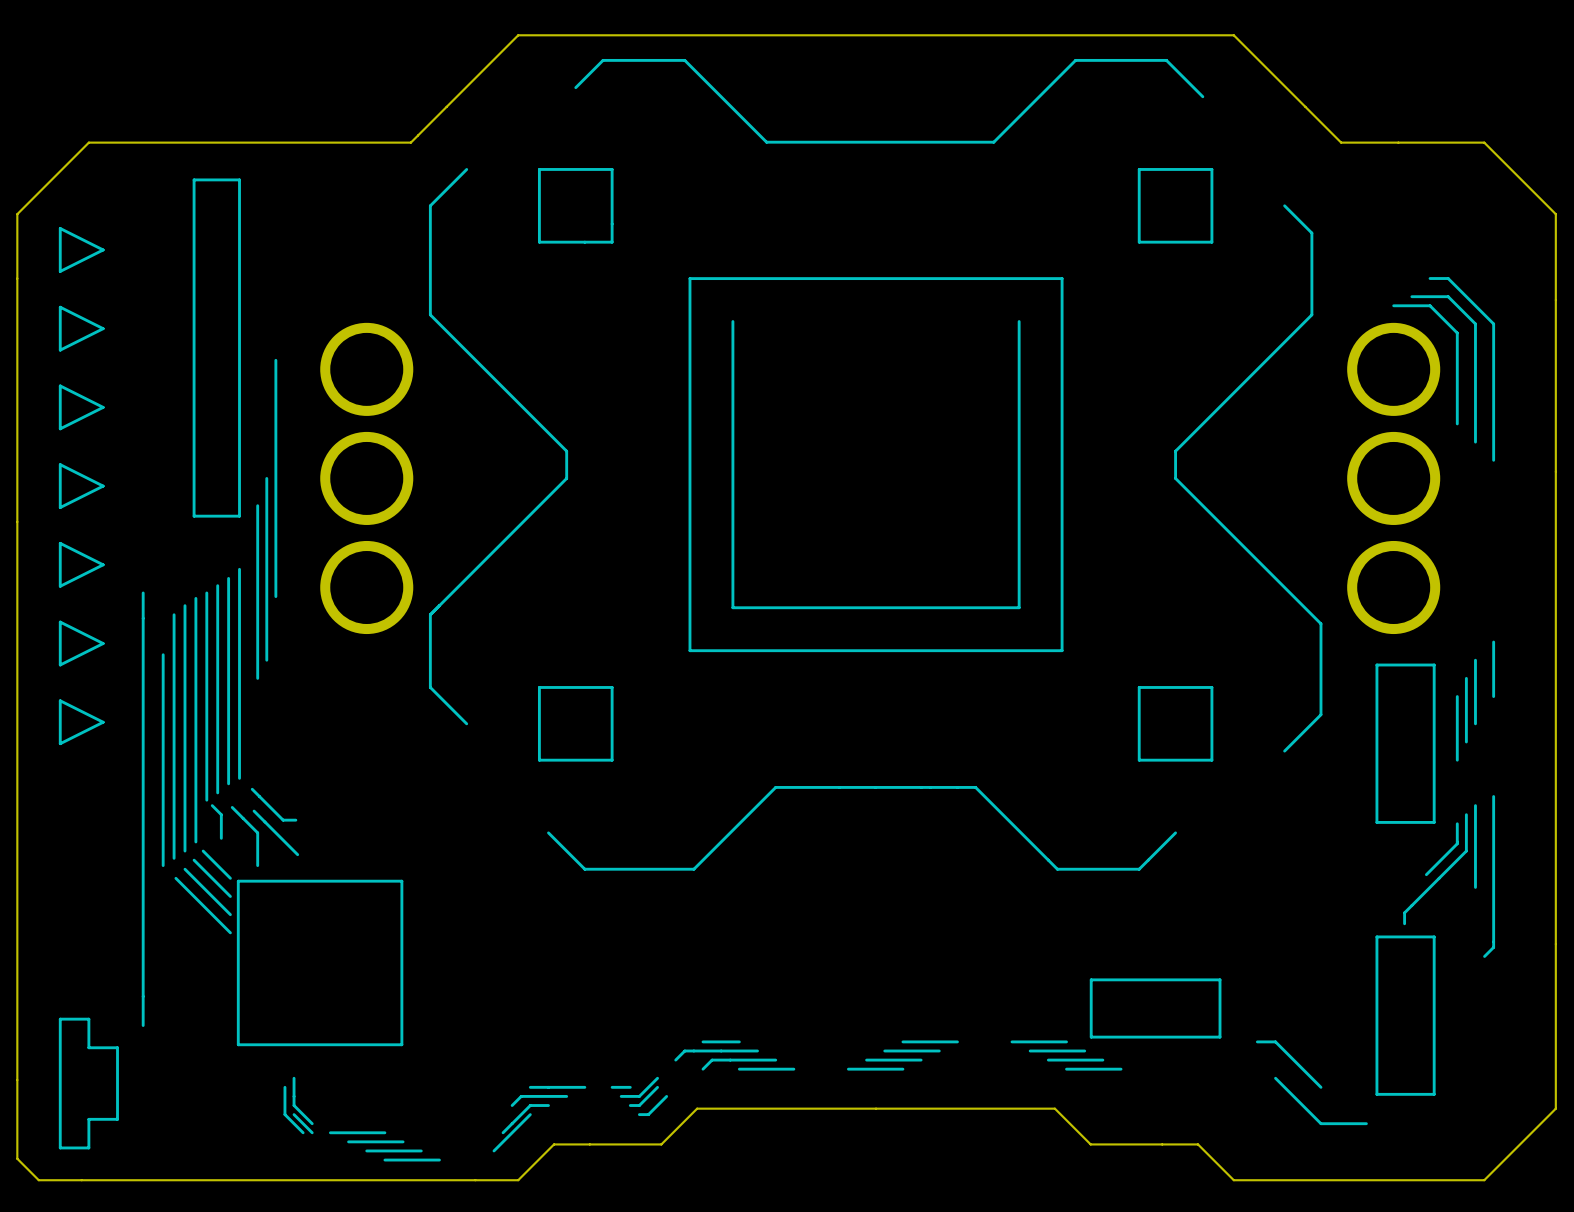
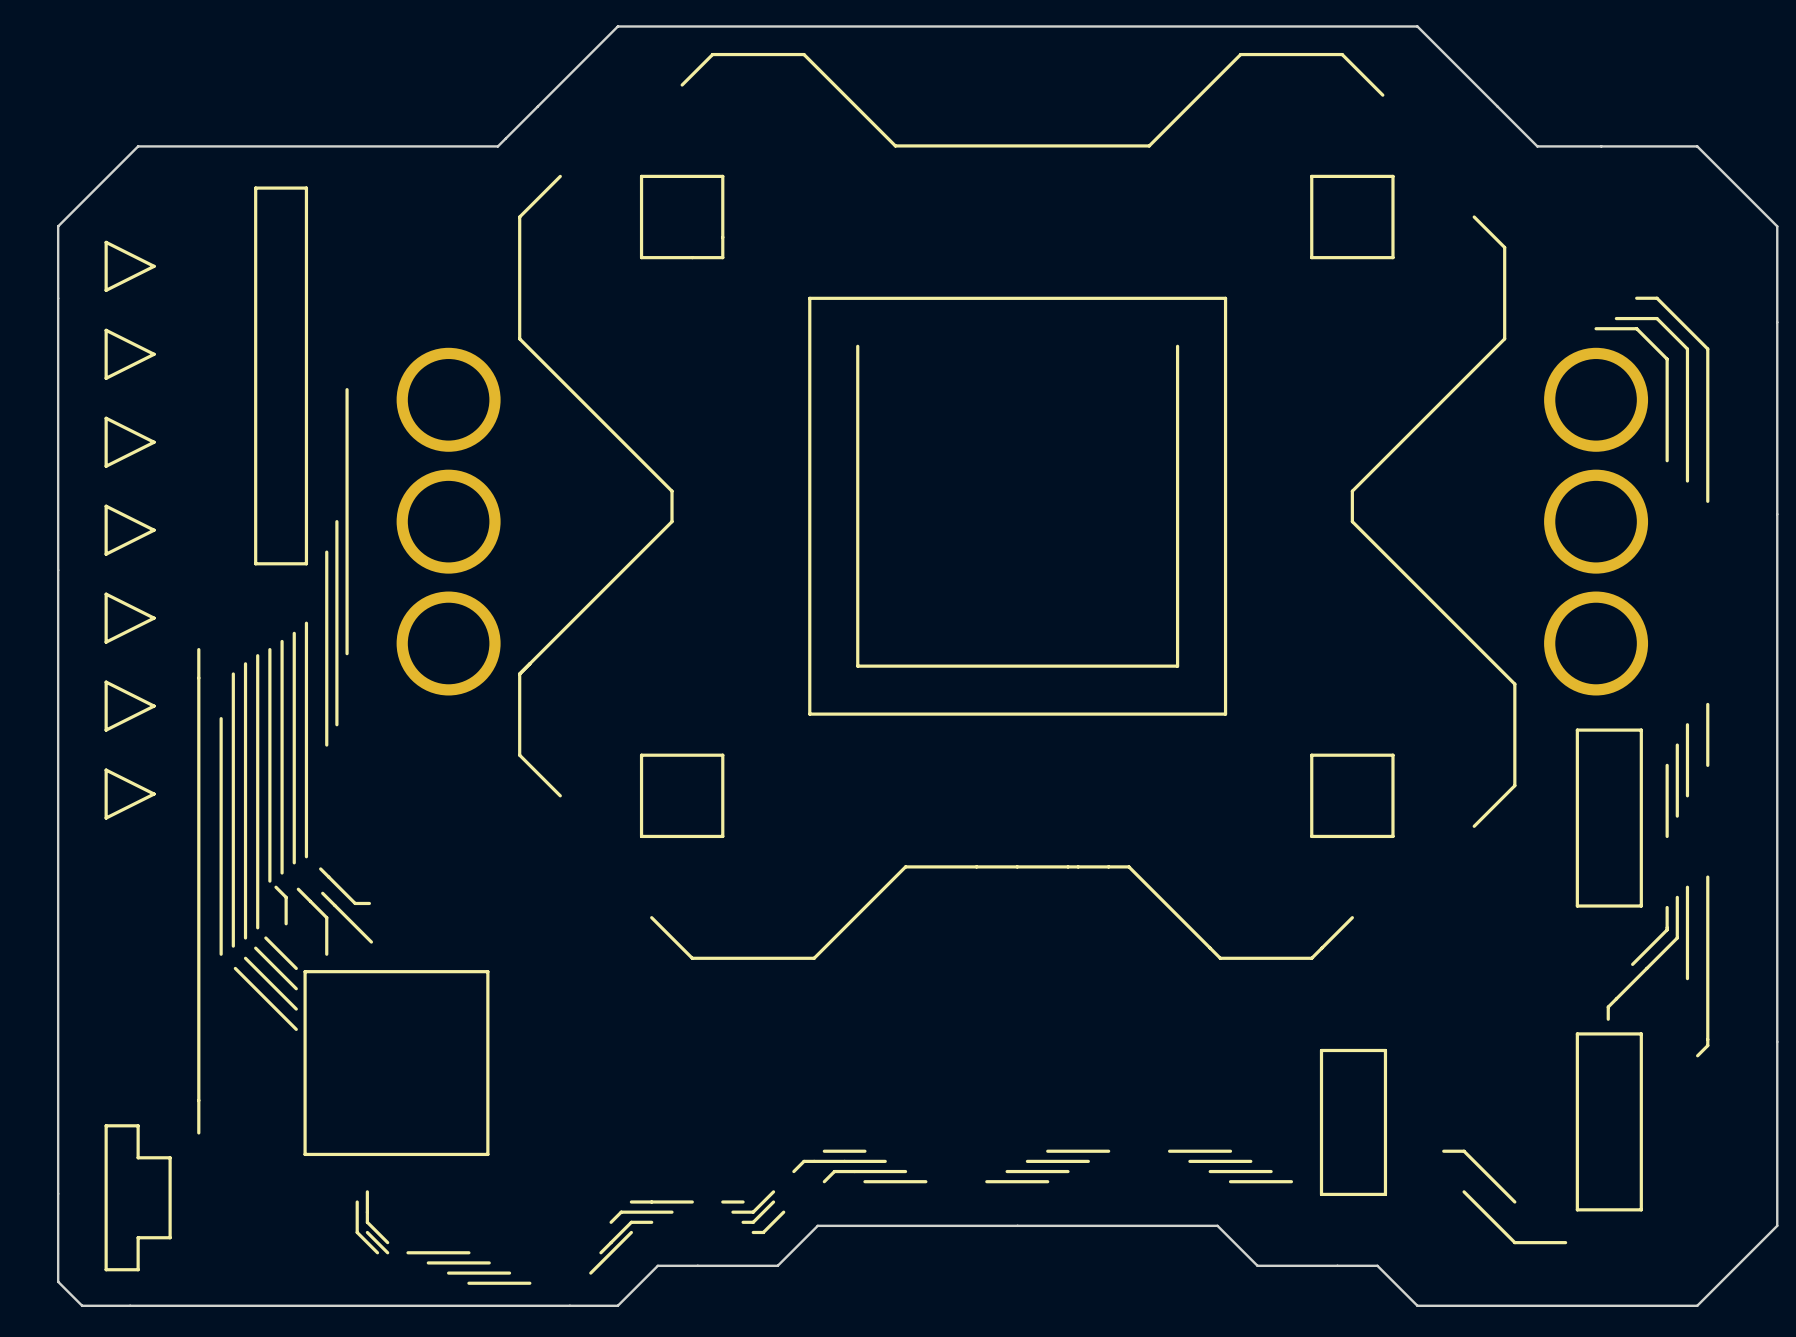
line: none -> (1385, 1050) (1321, 1050) (1321, 1194) (1385, 1194) (1385, 1050)
line: (1220, 979) (1220, 1037) (1091, 1037) (1091, 979) (1220, 979) -> none

